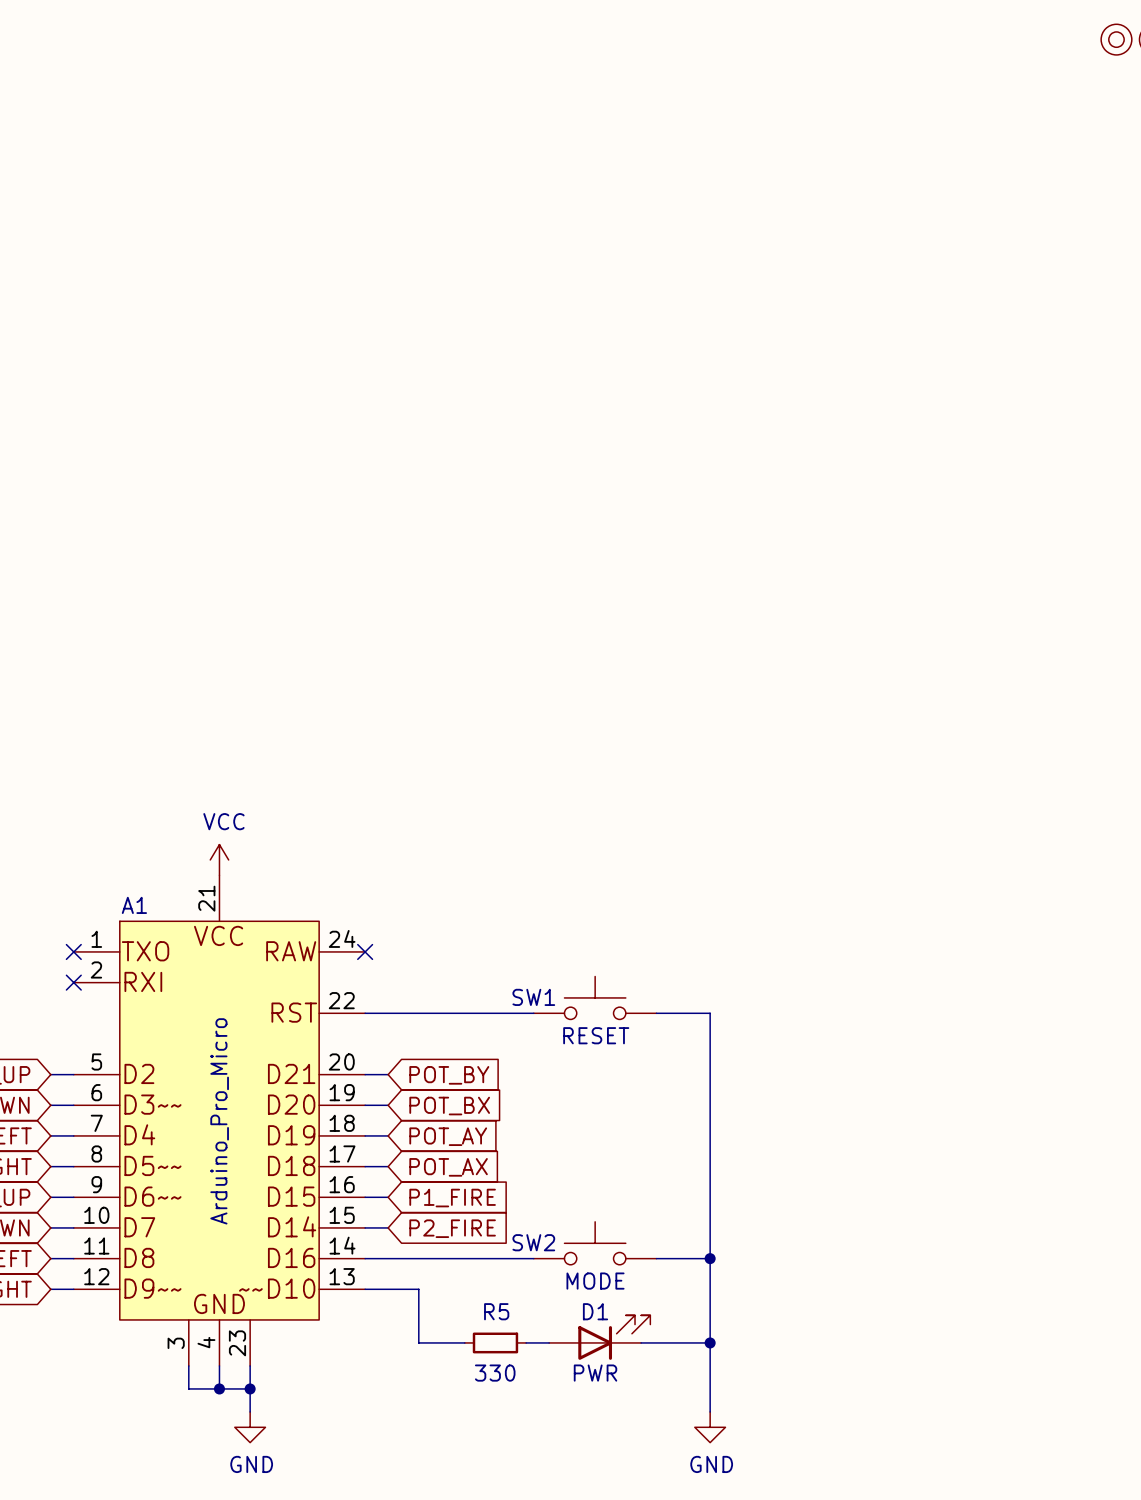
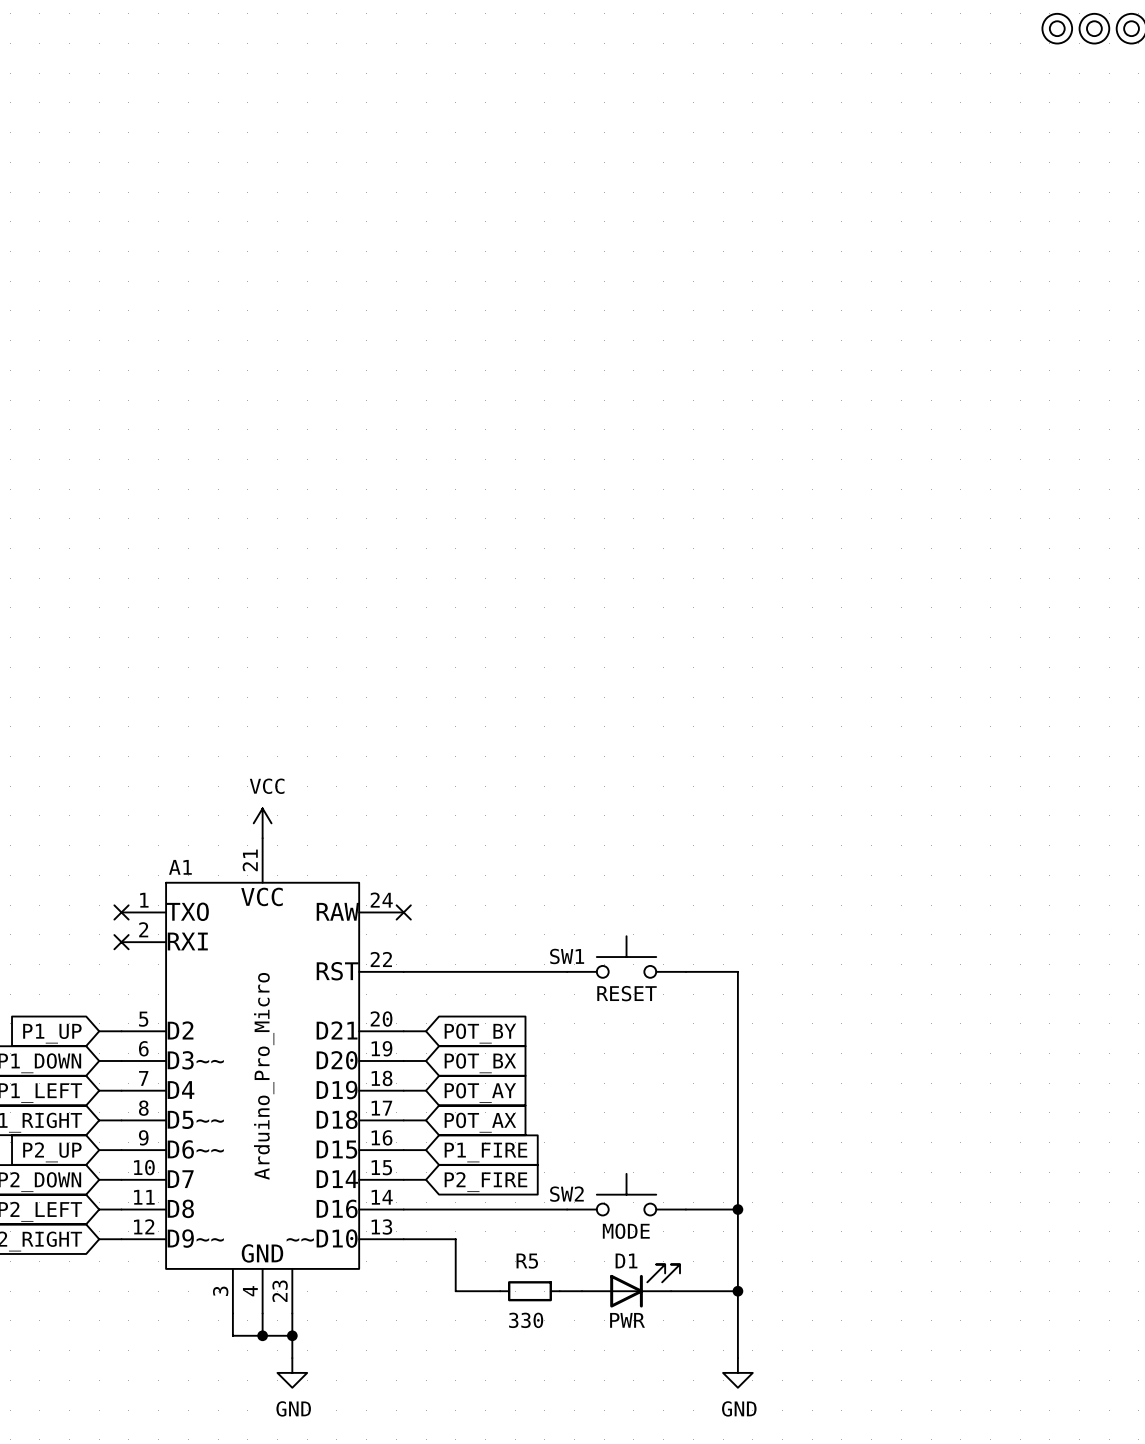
part: none -> (1057, 28)
part: none -> (1094, 28)

